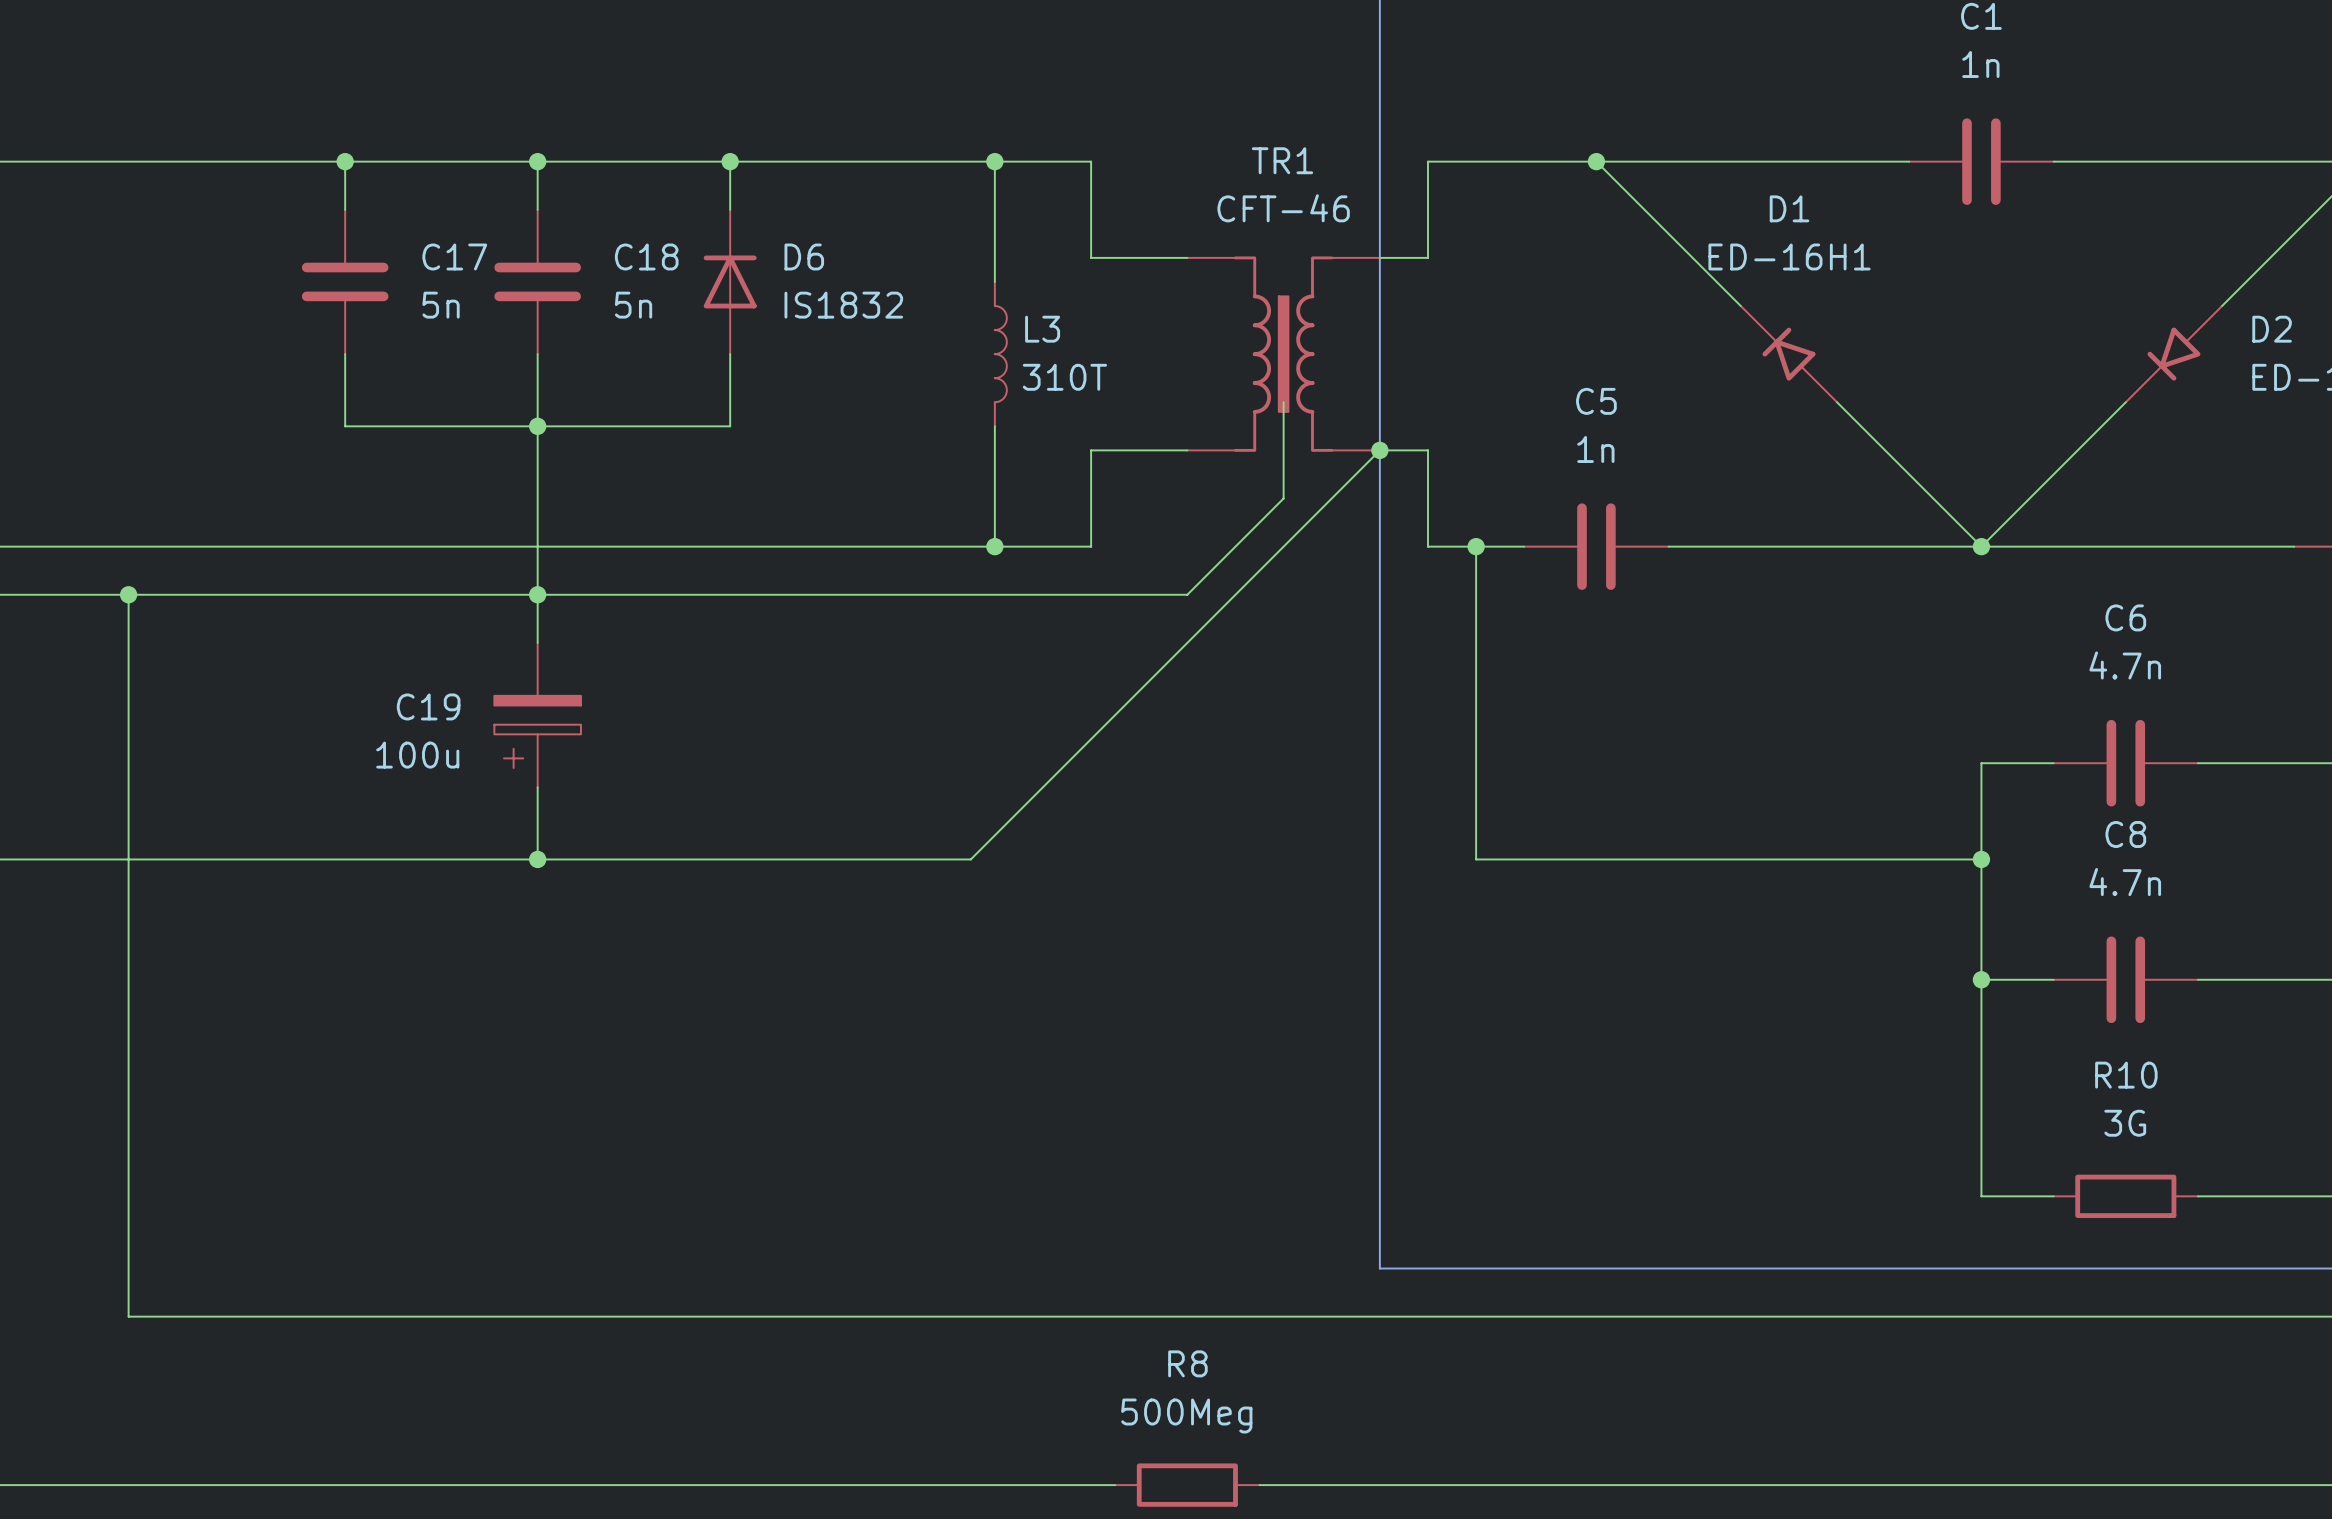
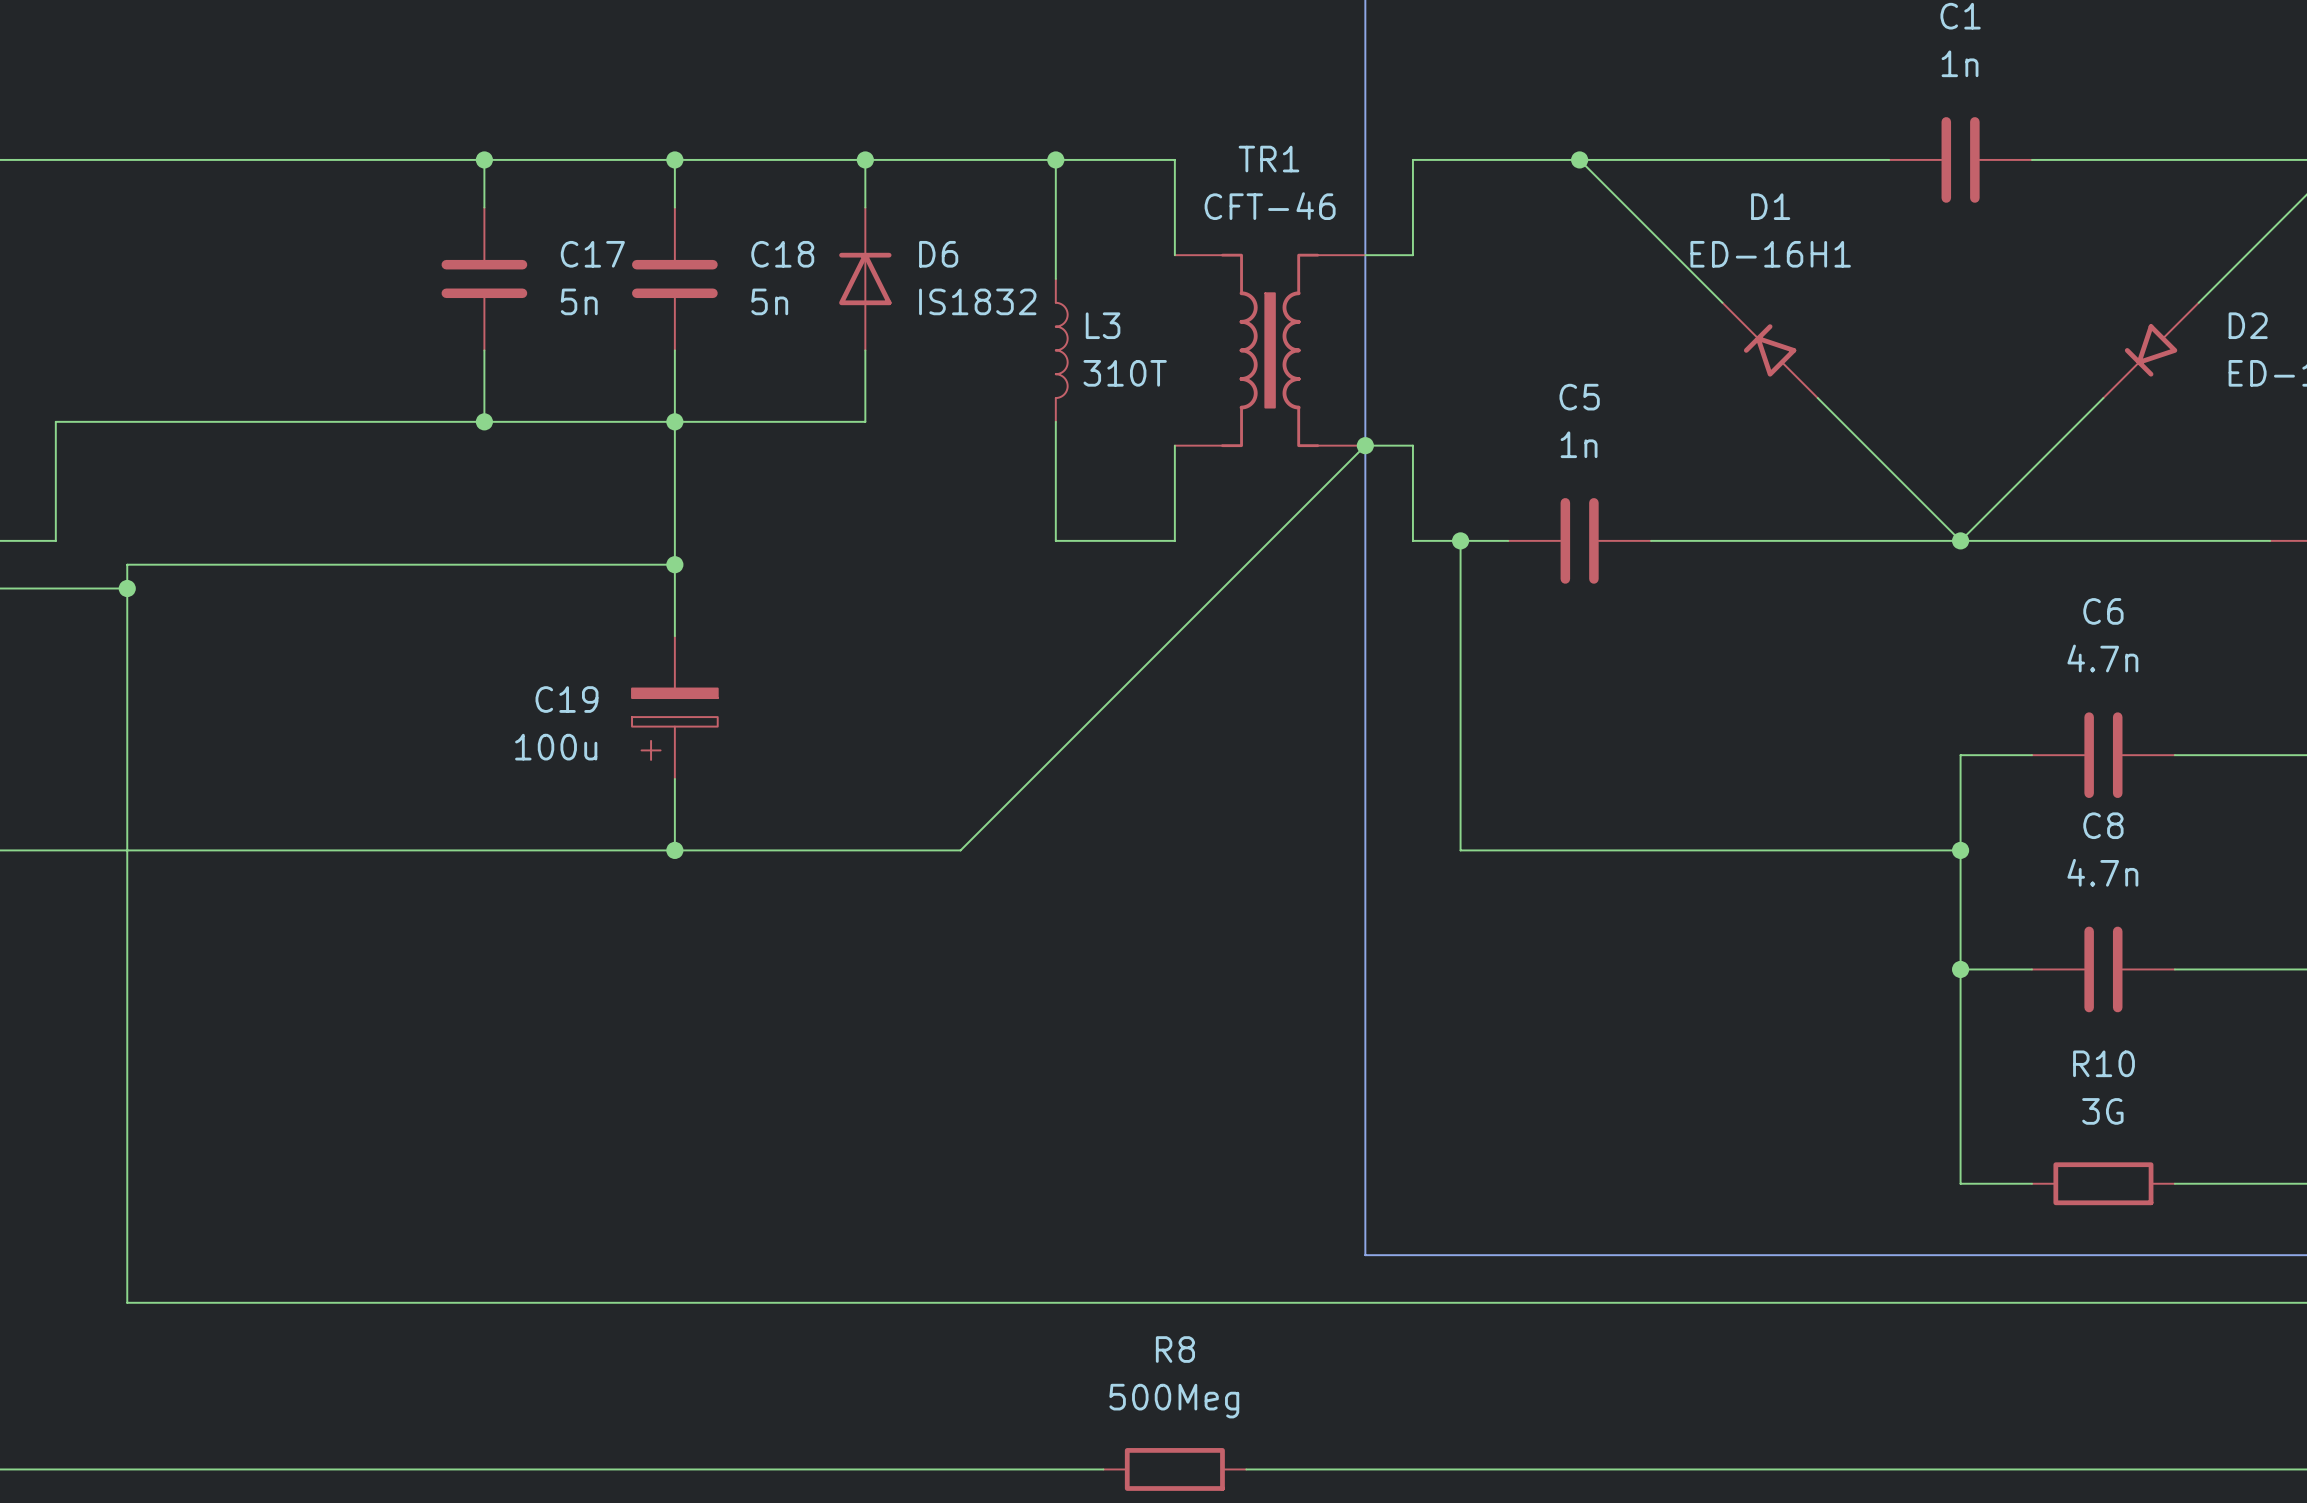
wire: (345, 161) (345, 209) -> (484, 159) (484, 207)
junction: (345, 161) -> none
wire: (537, 161) (537, 209) -> (674, 159) (674, 207)
junction position: (537, 161) -> (484, 159)
wire: (730, 161) (730, 209) -> (865, 159) (865, 207)
junction position: (730, 161) -> (674, 159)
junction: none -> (865, 159)
wire: (994, 161) (994, 281) -> (1055, 159) (1055, 278)
junction: (994, 161) -> none
junction: none -> (1055, 159)
wire: (1091, 161) (1091, 257) (1187, 257) -> (1079, 159) (1174, 159) (1174, 255)
C17 position: (345, 281) -> (484, 278)
C18 position: (537, 281) -> (674, 278)
D6 position: (730, 281) -> (865, 278)
wire: (345, 354) (345, 426) -> (55, 540) (55, 421) (341, 421)
wire: none -> (484, 350) (484, 421)
wire: (537, 354) (537, 642) -> (674, 350) (674, 636)
wire: (730, 354) (730, 426) -> (865, 350) (865, 421) (722, 421)
L3 position: (1000, 354) -> (1061, 350)
wire: (1283, 402) (1283, 498) (1187, 594) (128, 594) -> (674, 564) (127, 564) (127, 588)
junction position: (537, 426) -> (484, 421)
junction: none -> (674, 421)
wire: (994, 426) (994, 546) -> none
wire: (1187, 450) (1091, 450) (1091, 546) -> (1174, 445) (1174, 540) (1079, 540)
wire: (56, 546) (1067, 546) -> (1055, 421) (1055, 540)
junction: (994, 546) -> none
junction: none -> (674, 564)
junction: (537, 594) -> none
C19 position: (537, 715) -> (674, 707)
wire: (537, 787) (537, 859) -> (674, 778) (674, 850)
junction: (537, 859) -> none
junction: none -> (674, 850)

